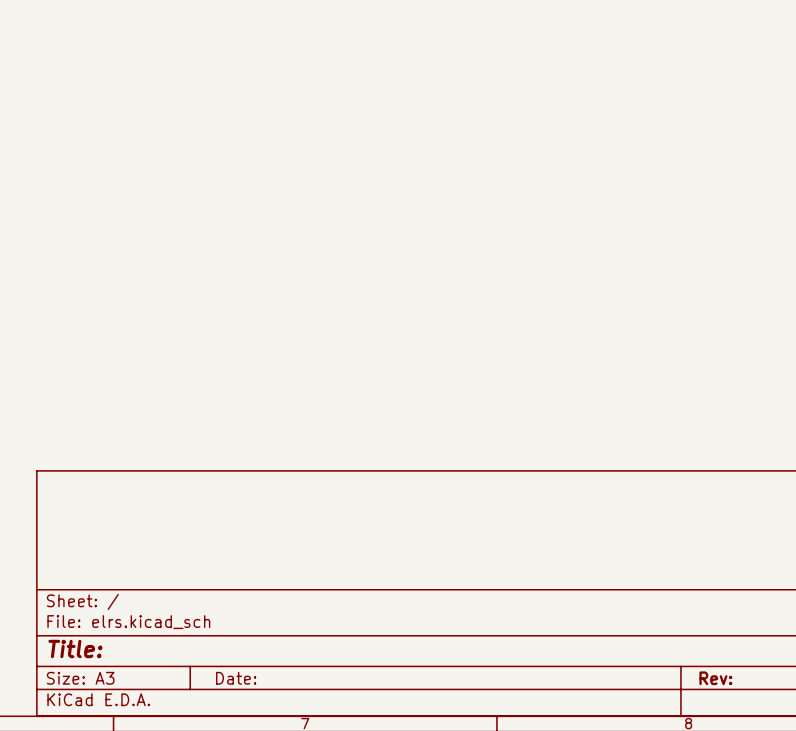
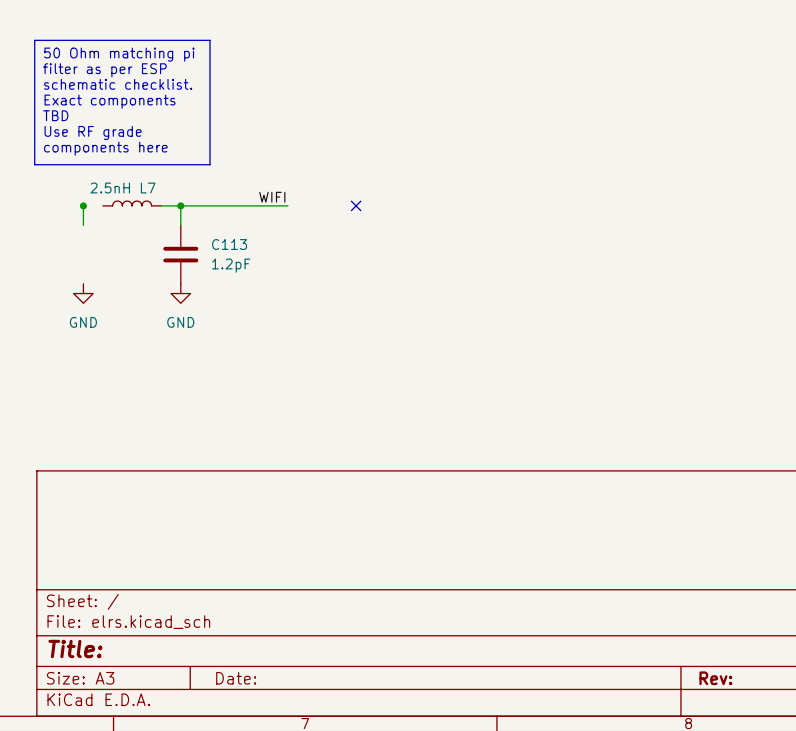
line: none -> (34, 40) (210, 40) (210, 164) (34, 164) (34, 40)
text: none -> 50 Ohm matching pi (119, 54)
text: none -> filter as per ESP (104, 70)
text: none -> schematic checklist. (118, 84)
text: none -> Exact components (110, 101)
text: none -> TBD (55, 115)
text: none -> Use RF grade (93, 133)
text: none -> components here (105, 148)
label: none -> WIFI (272, 197)
L7: none -> 2.5nH (132, 203)
wire: none -> (83, 205) (83, 225)
junction: none -> (83, 205)
wire: none -> (161, 205) (287, 205)
wire: none -> (180, 205) (180, 225)
junction: none -> (180, 205)
no-connect mark: none -> (356, 205)
C113: none -> 1.2pF (180, 254)
power symbol: none -> GND (83, 293)
power symbol: none -> GND (180, 293)

